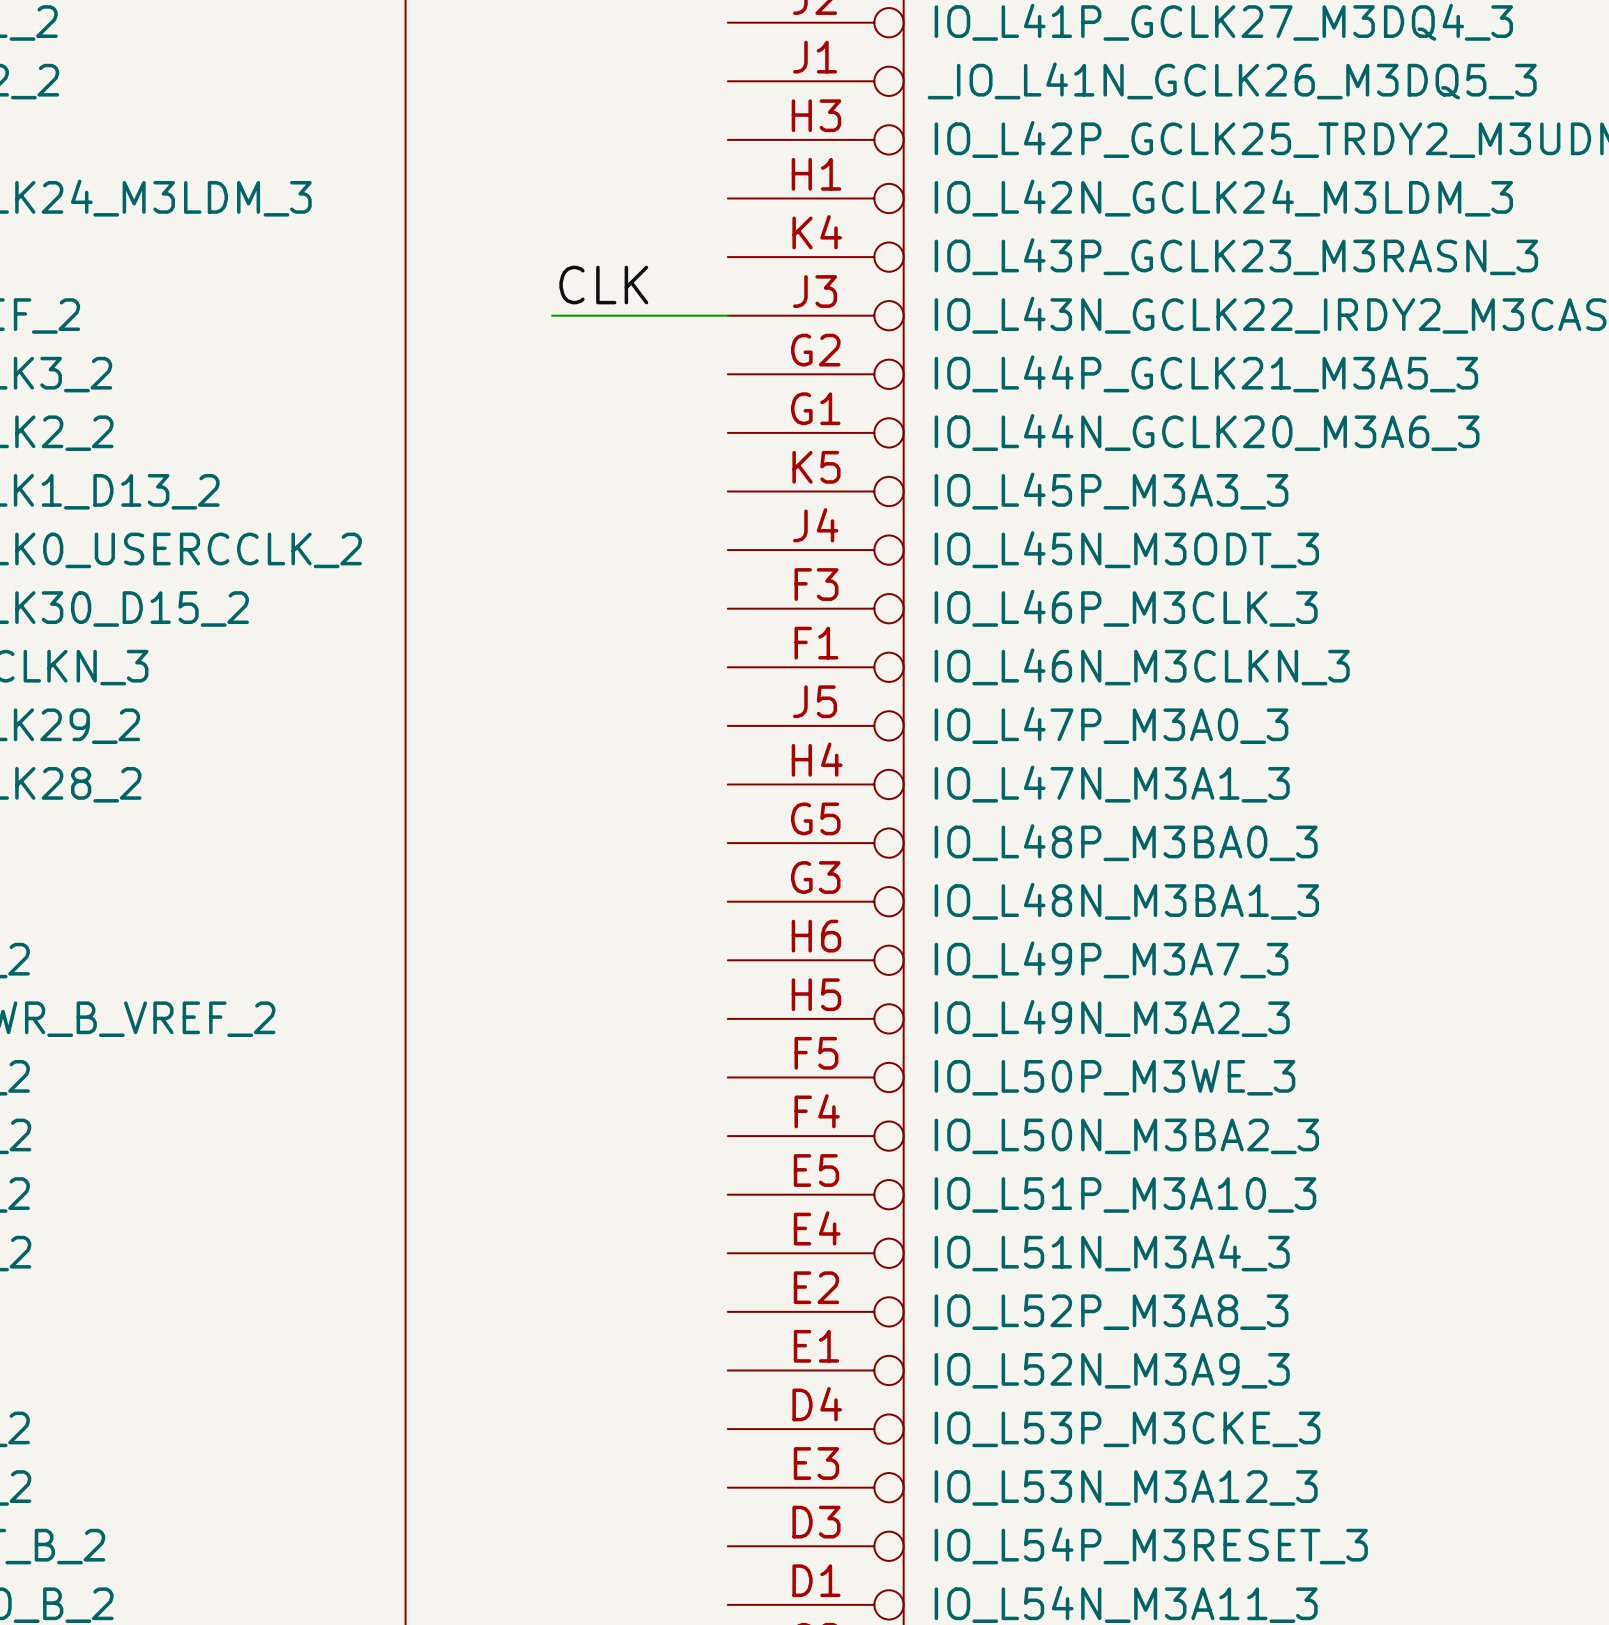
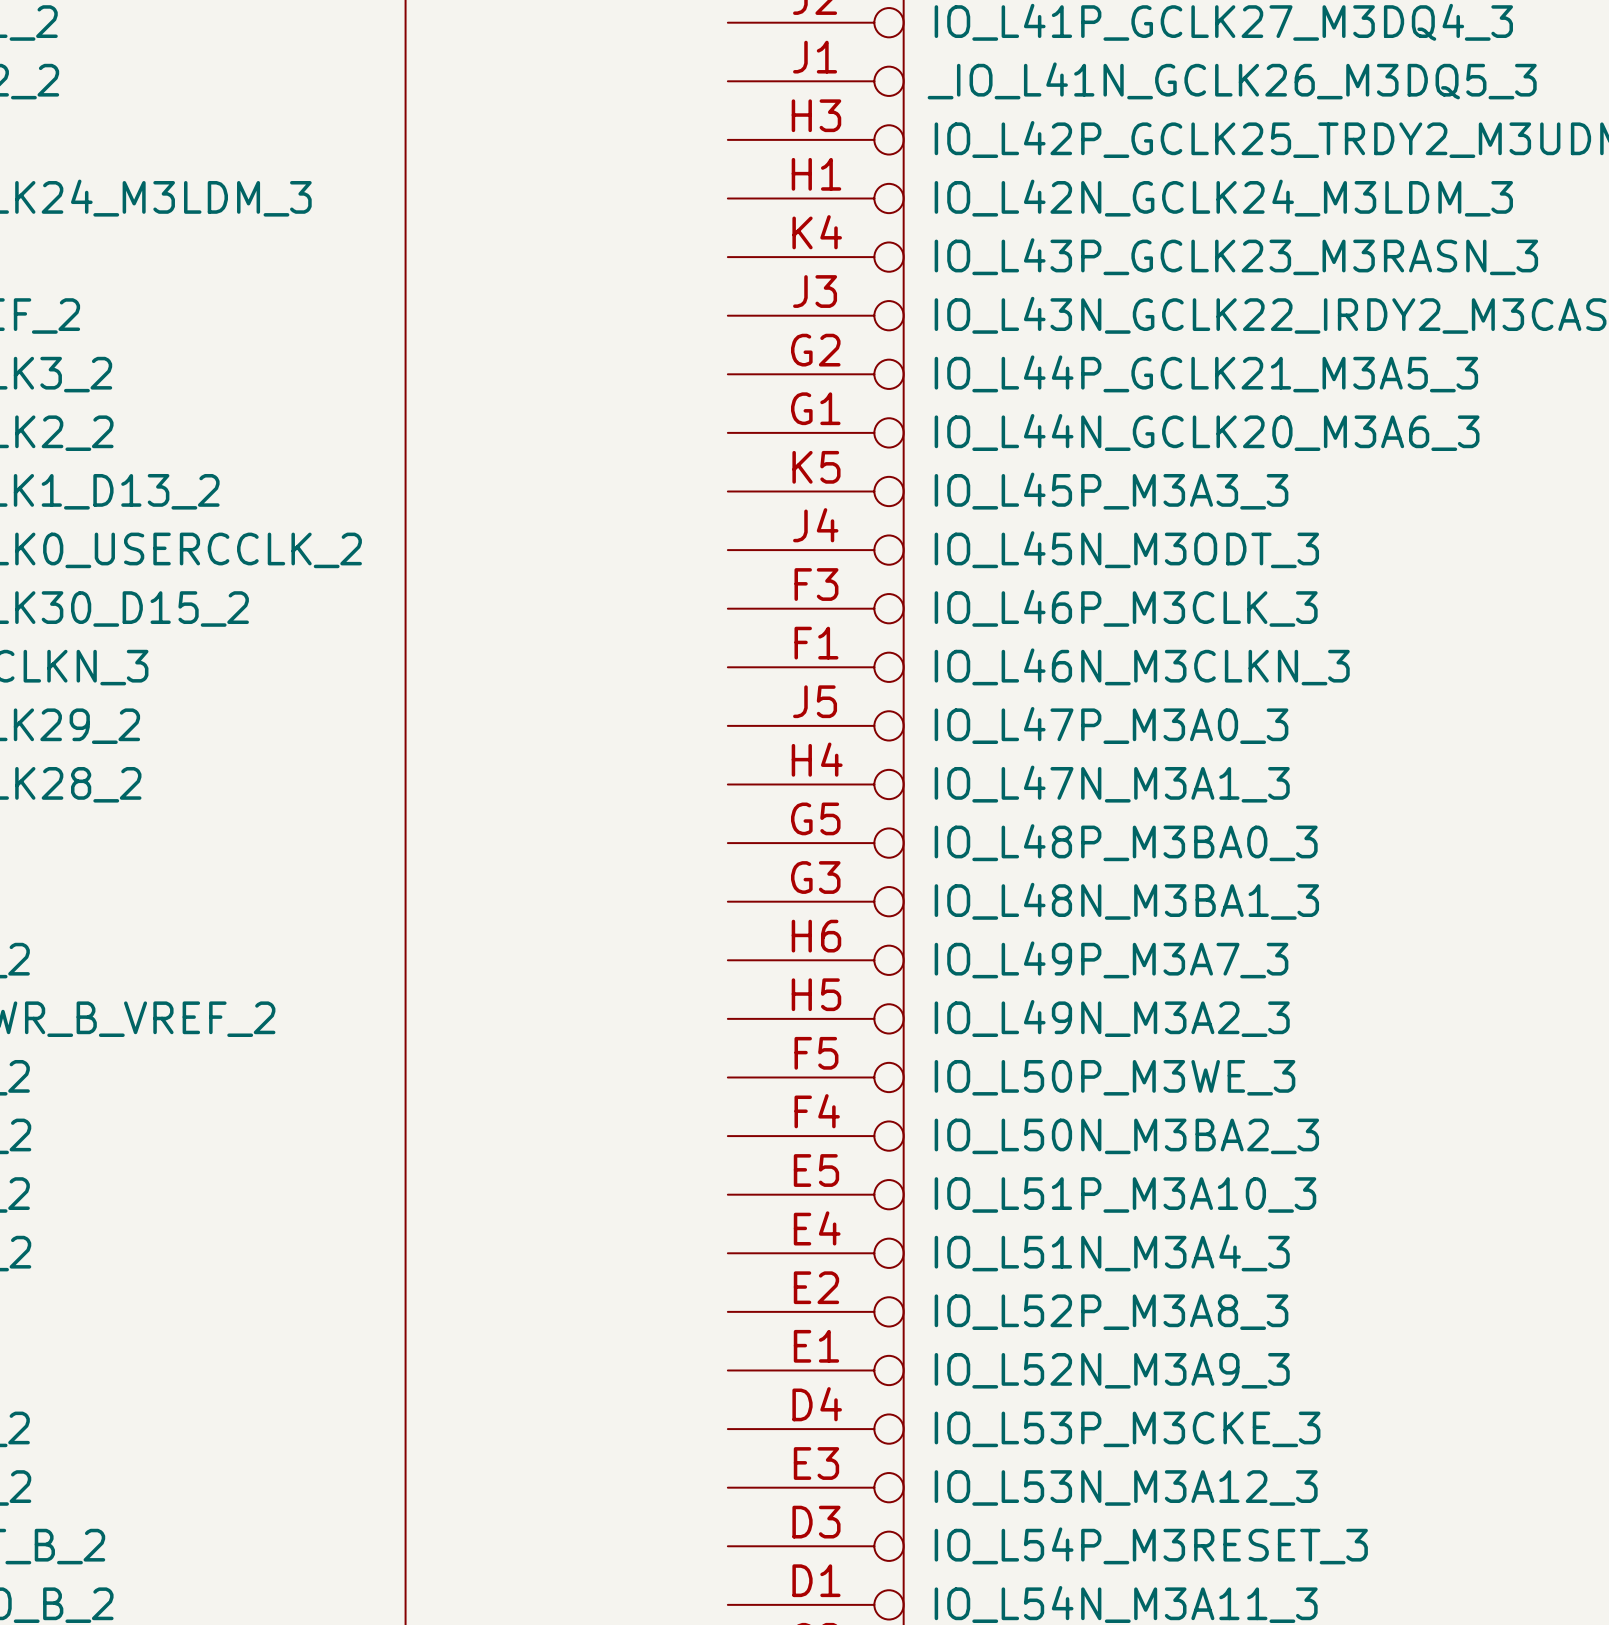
label: CLK (603, 285) -> none
wire: (552, 315) (727, 315) -> none

